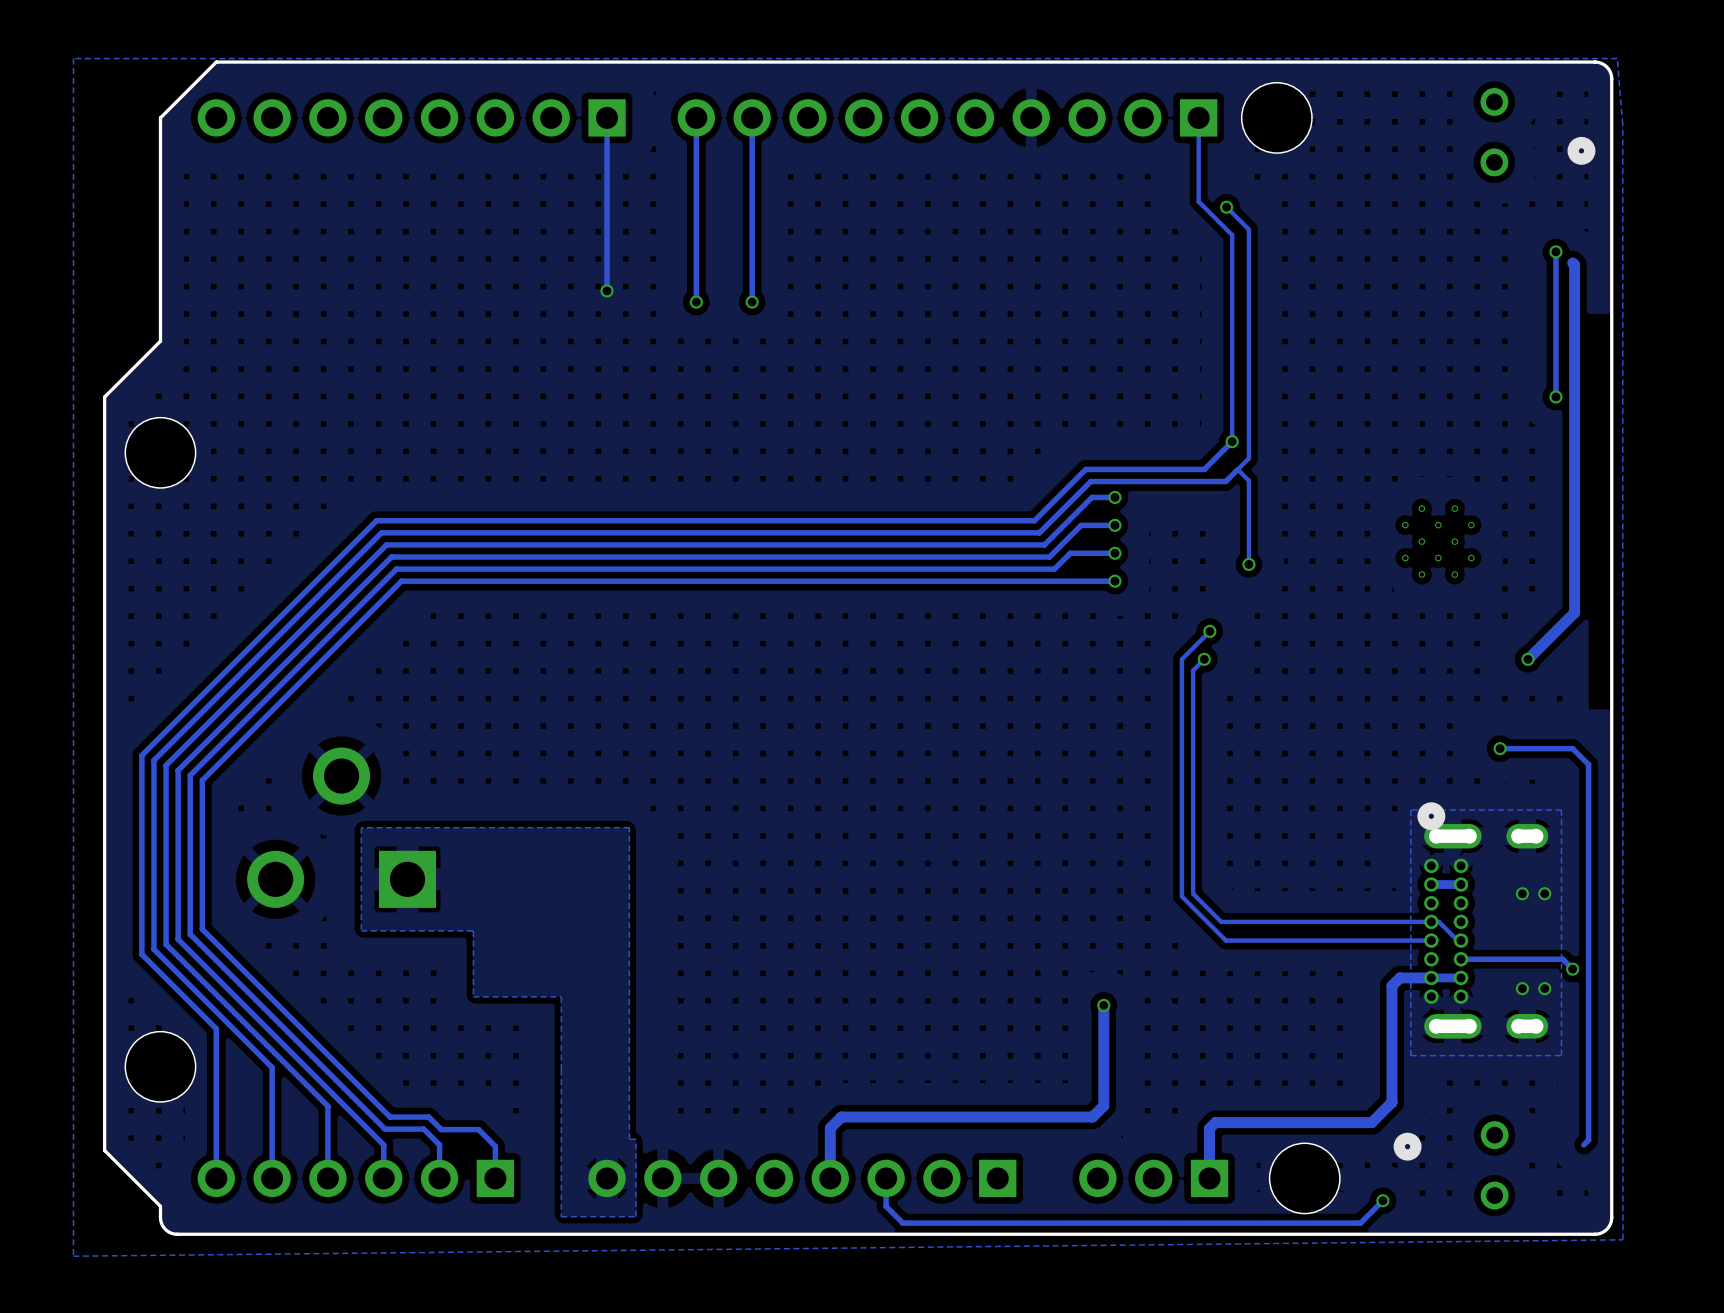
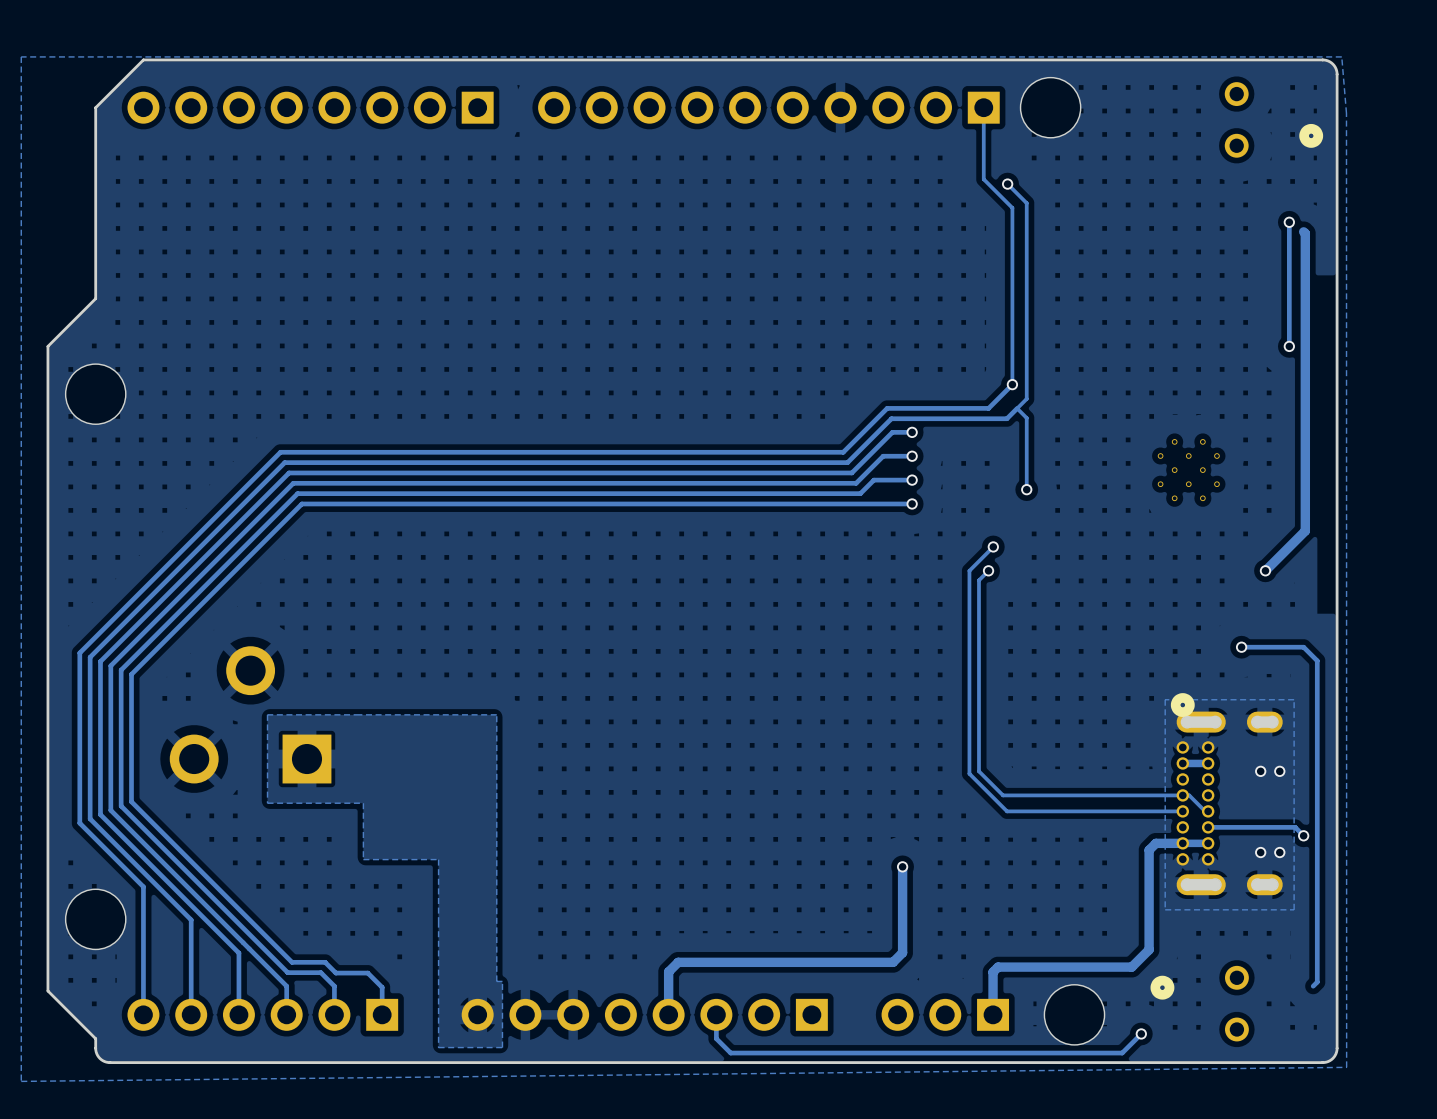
track: (607, 117) (607, 290) -> none
track: (696, 117) (696, 302) -> none
track: (752, 117) (752, 302) -> none
via: (607, 290) -> none
via: (696, 302) -> none
via: (752, 302) -> none

